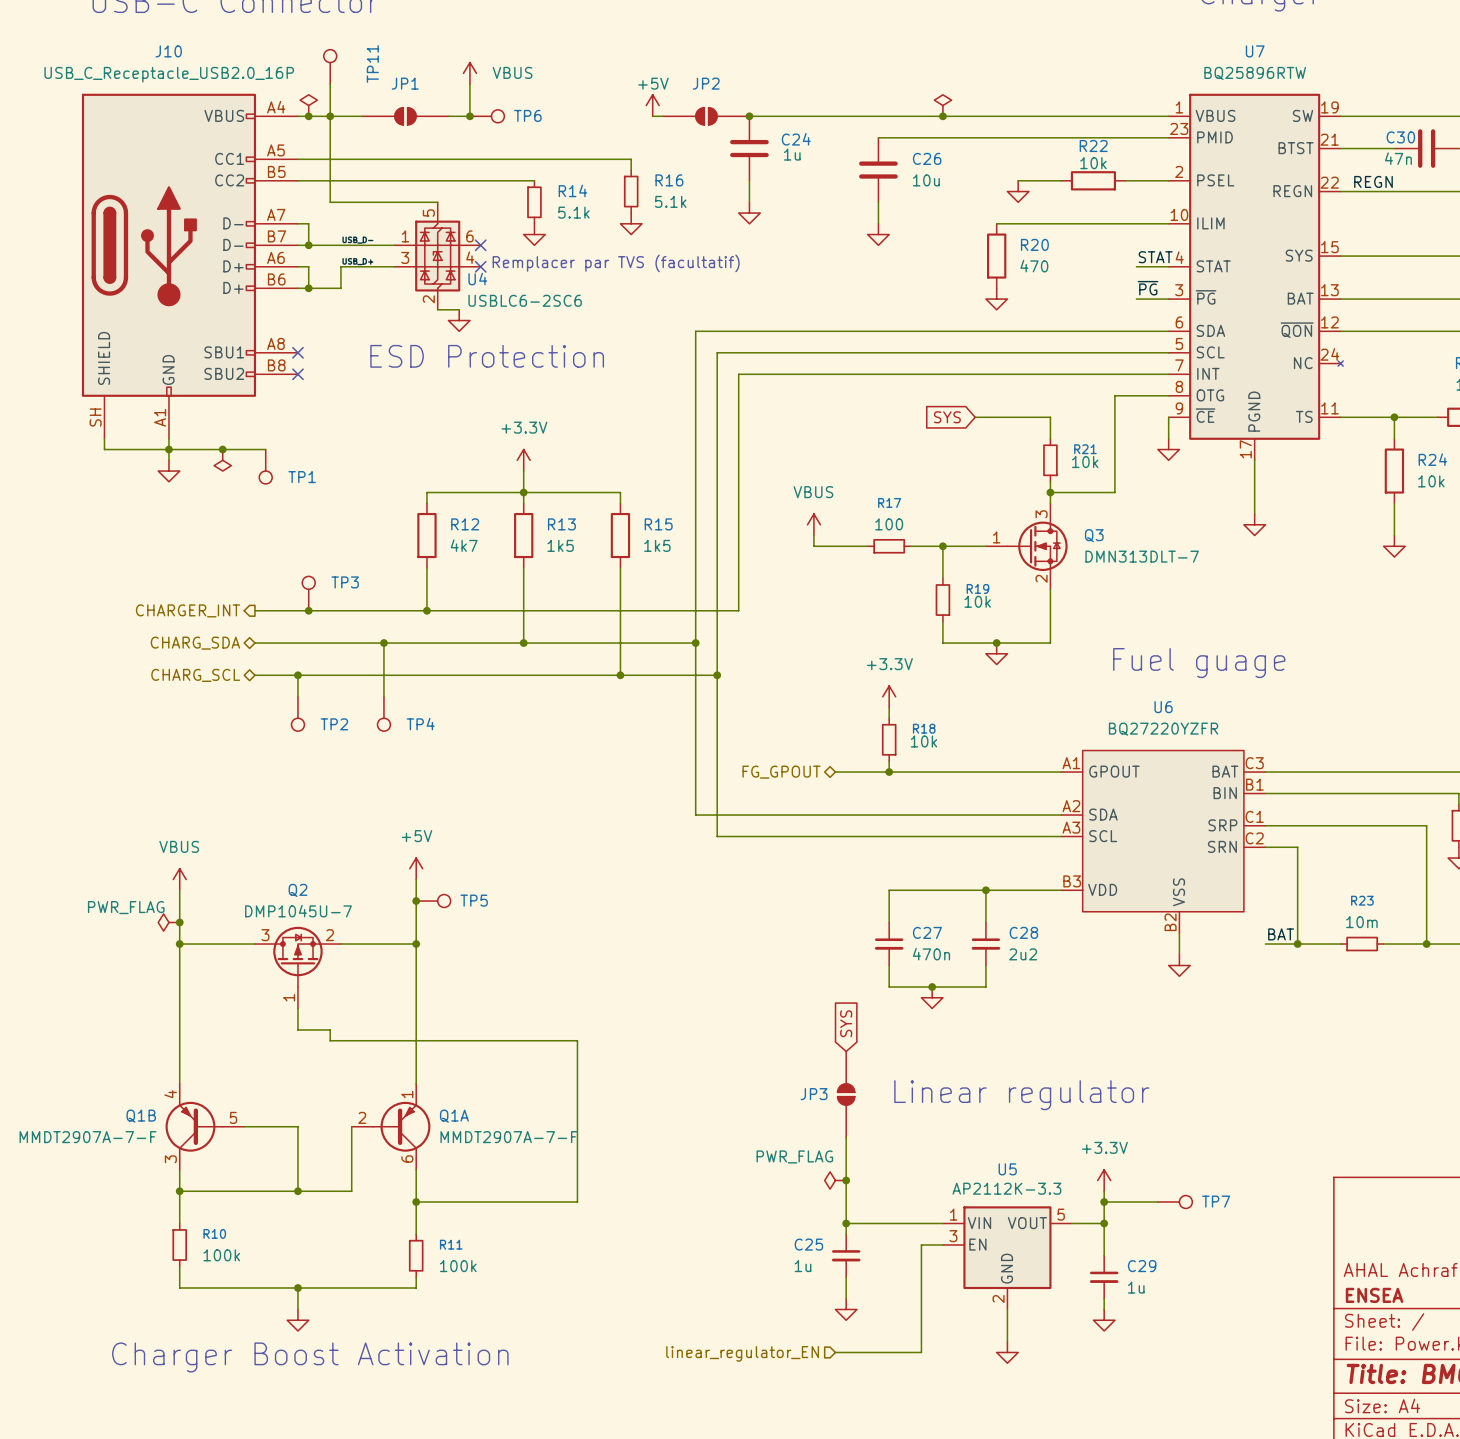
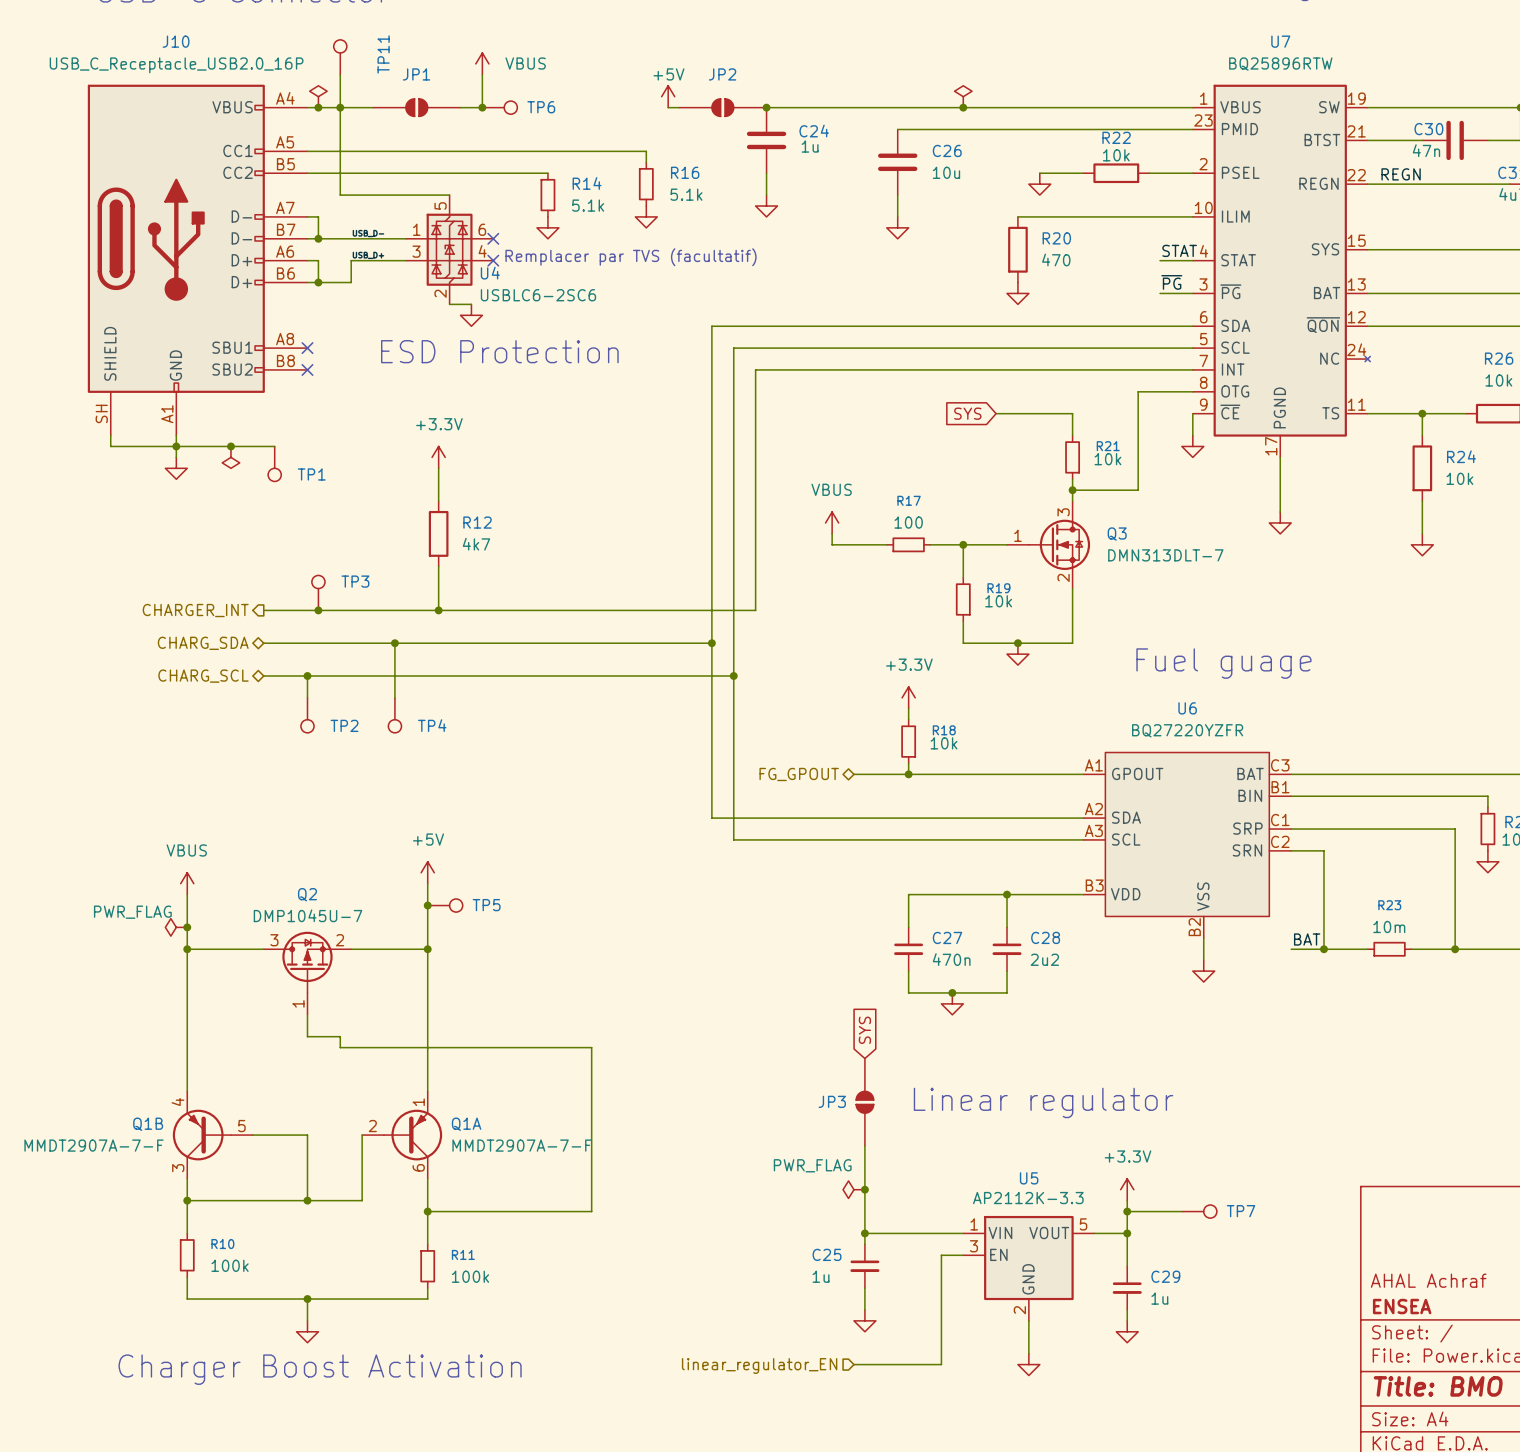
power symbol position: +3.3V (523, 460) -> +3.3V (438, 457)
wire: (523, 471) (523, 503) -> none
wire: (426, 492) (620, 492) (620, 503) -> (438, 490) (438, 468)
junction: (523, 492) -> none
R13: 1k5 (523, 535) -> none
R15: 1k5 (620, 535) -> none
wire: (523, 567) (523, 643) -> none
wire: (620, 567) (620, 675) -> none
junction: (523, 643) -> none
junction: (620, 675) -> none

